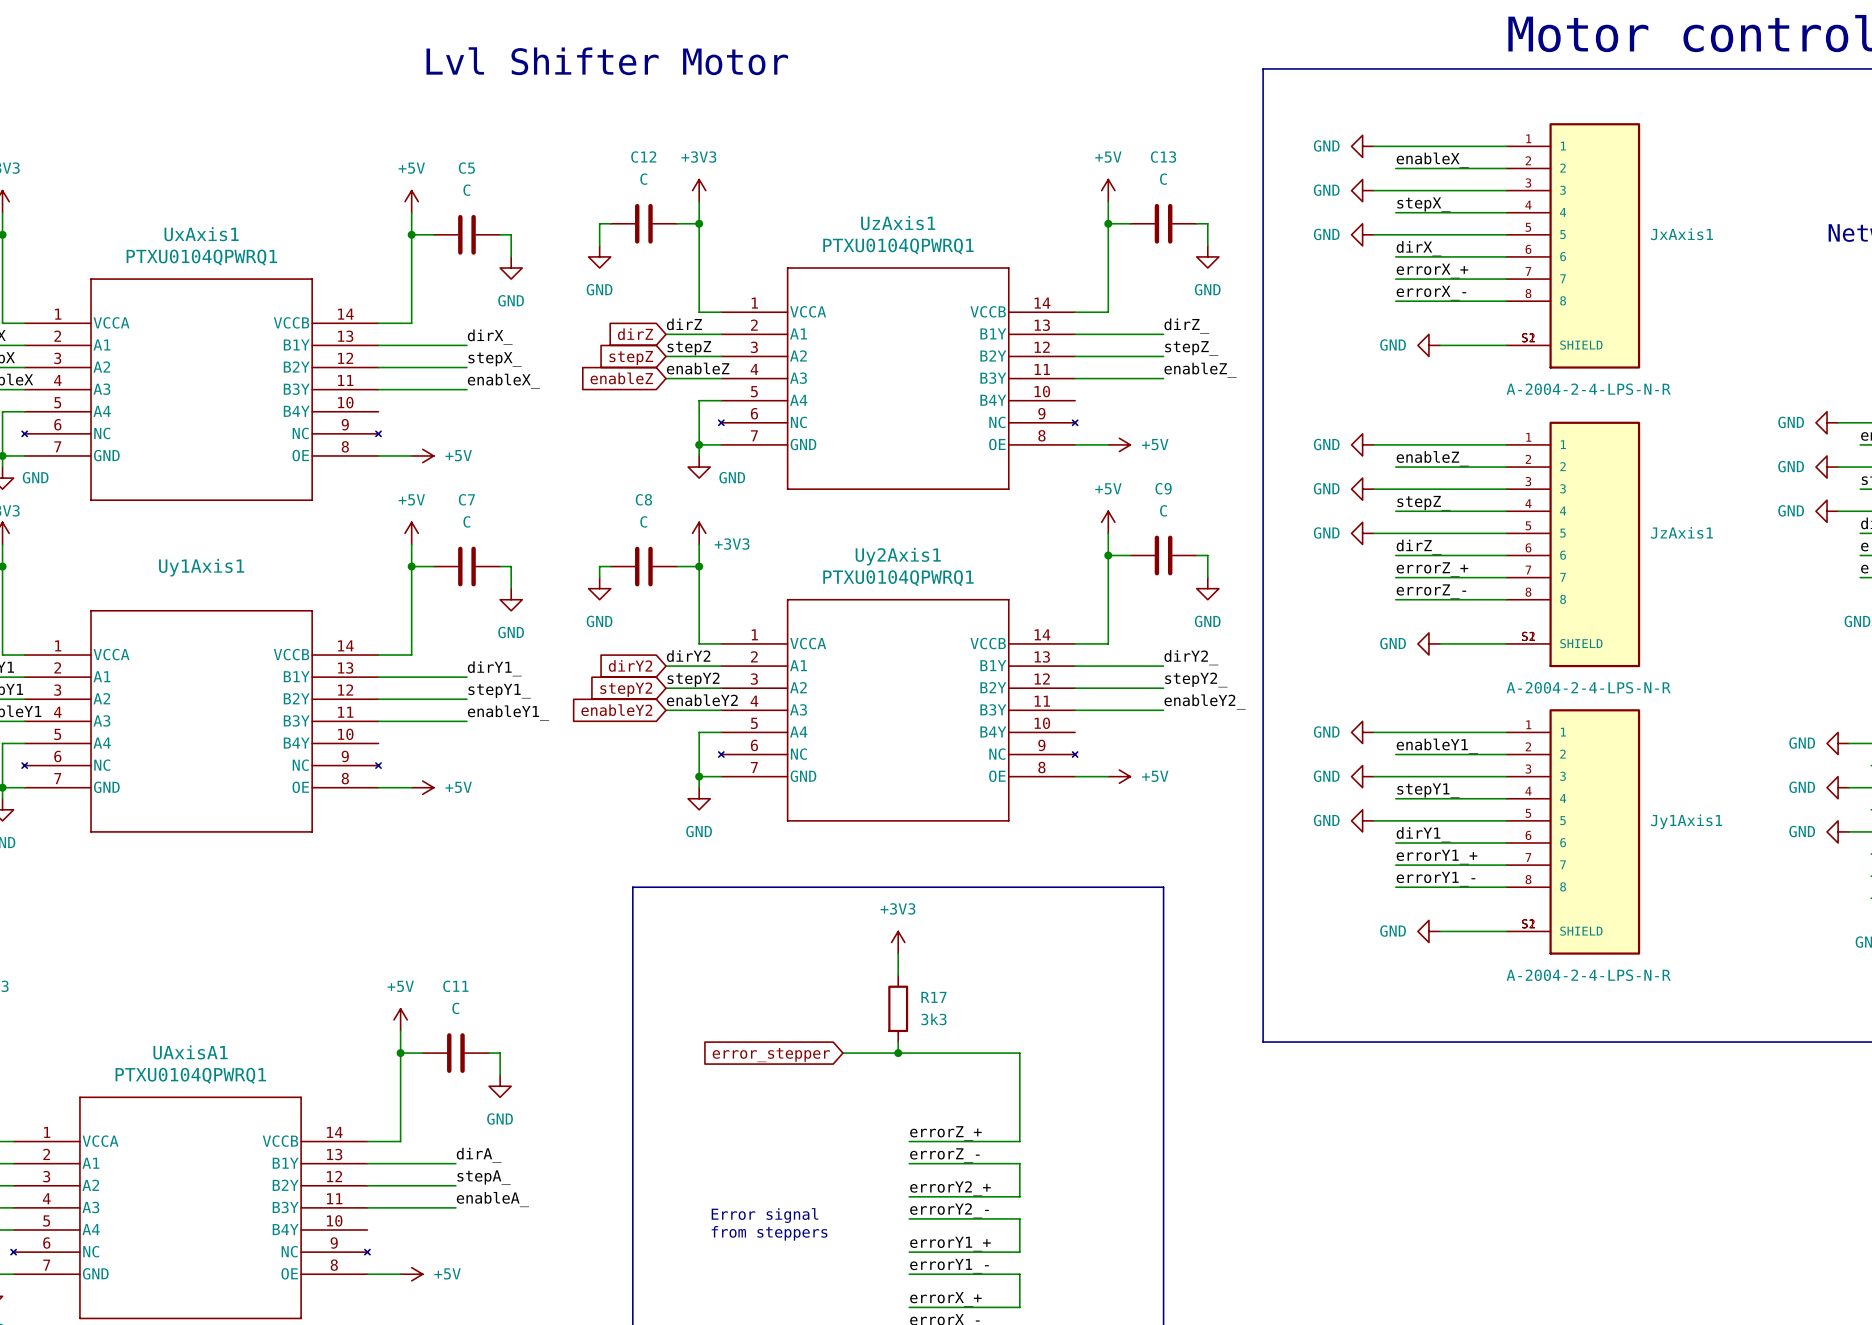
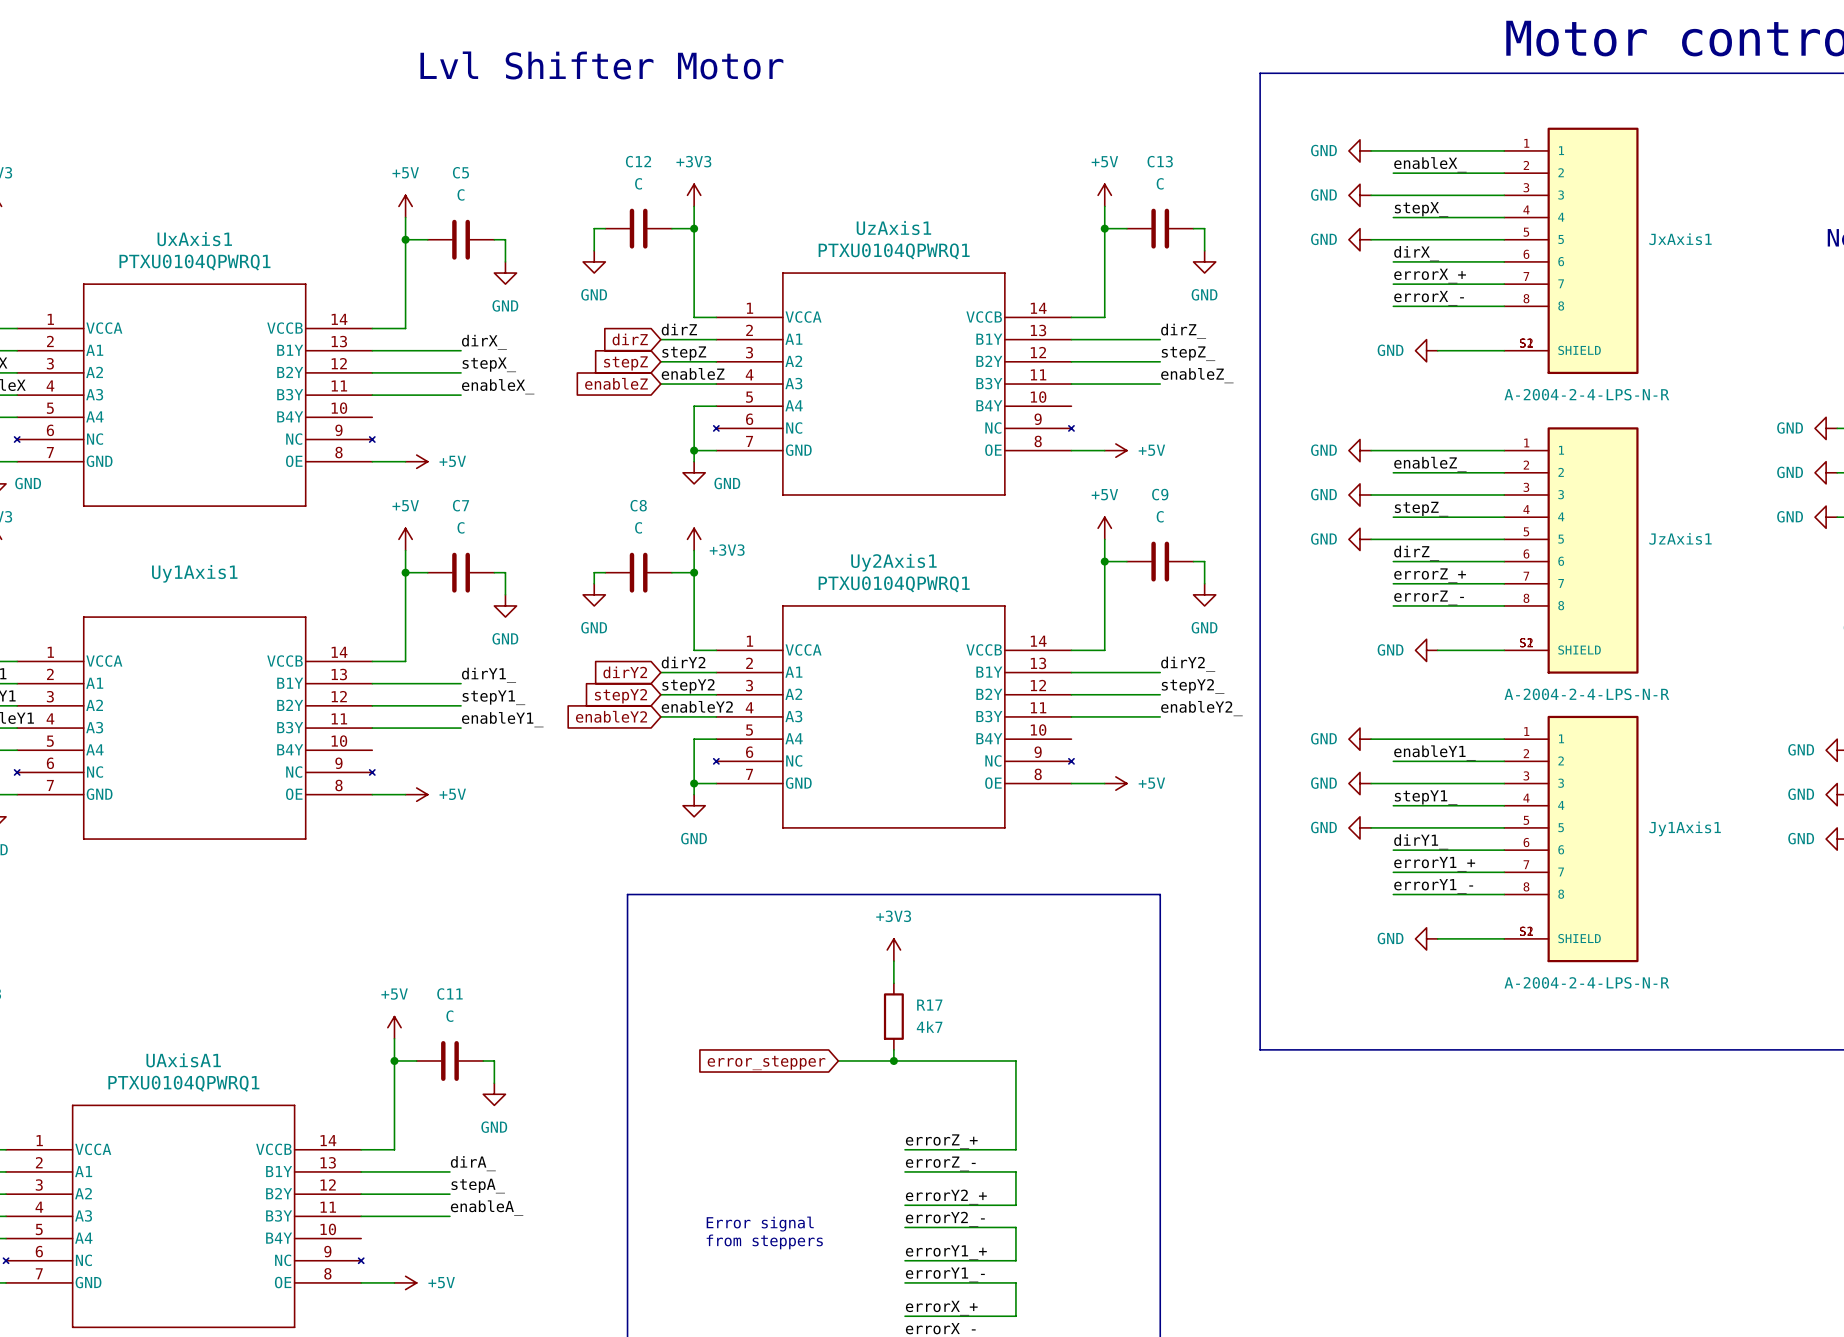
R17 value: 3k3 (933, 1019) -> 4k7 (929, 1027)

